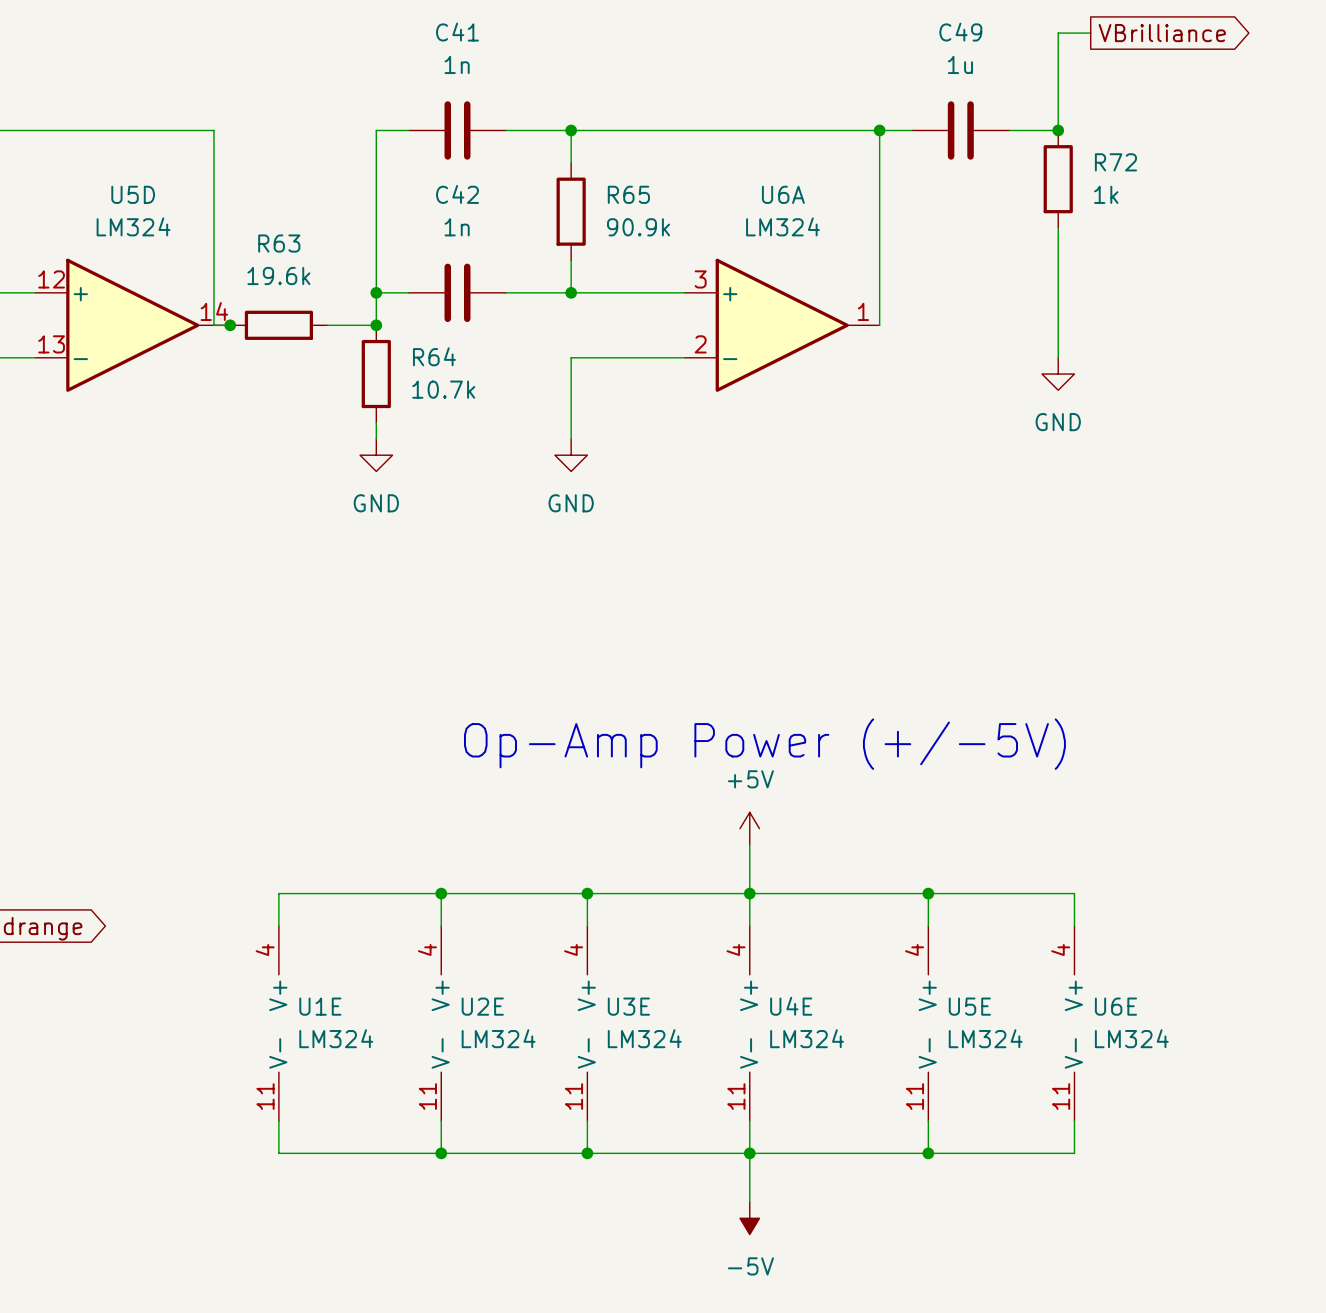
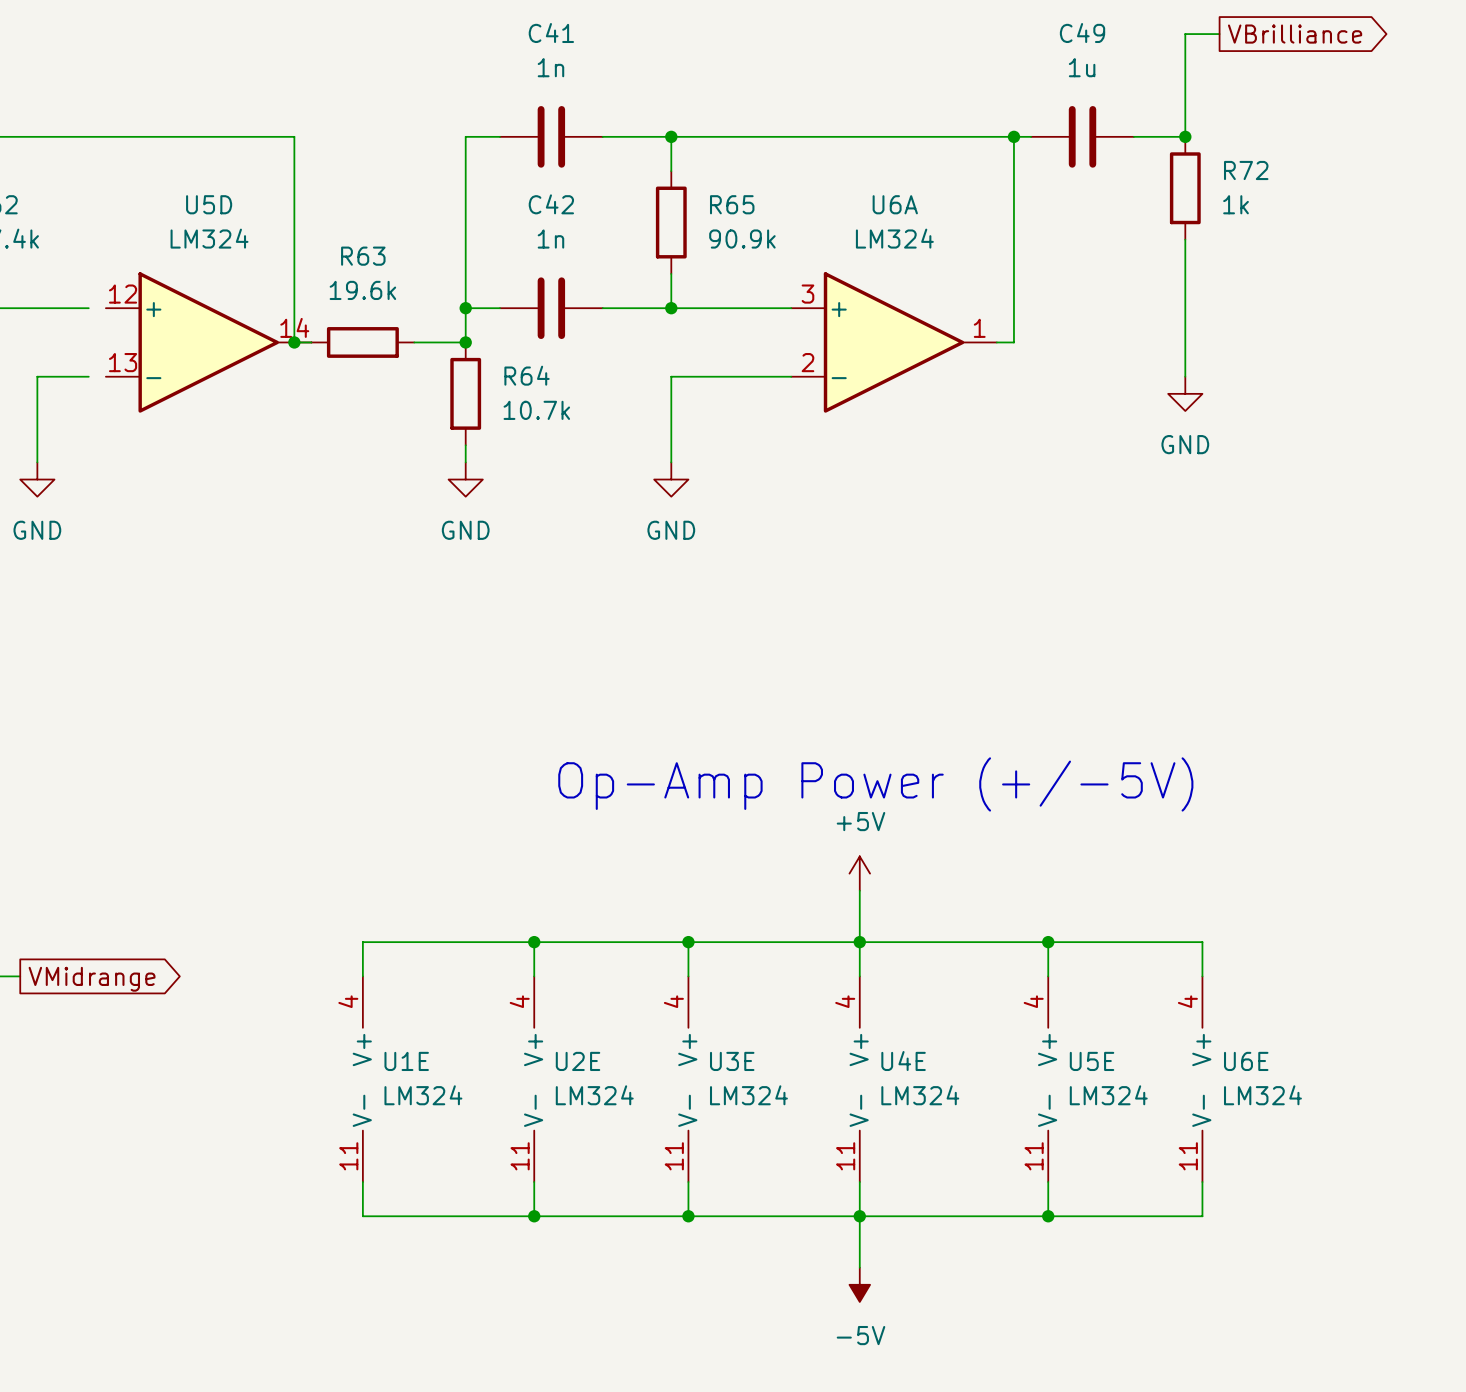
wire: (879, 130) (879, 325) -> (1013, 136) (1013, 342) (996, 342)
junction position: (879, 130) -> (1013, 136)
wire: (19, 292) (35, 292) -> none
junction position: (230, 325) -> (294, 342)
wire: (19, 357) (35, 357) -> none

